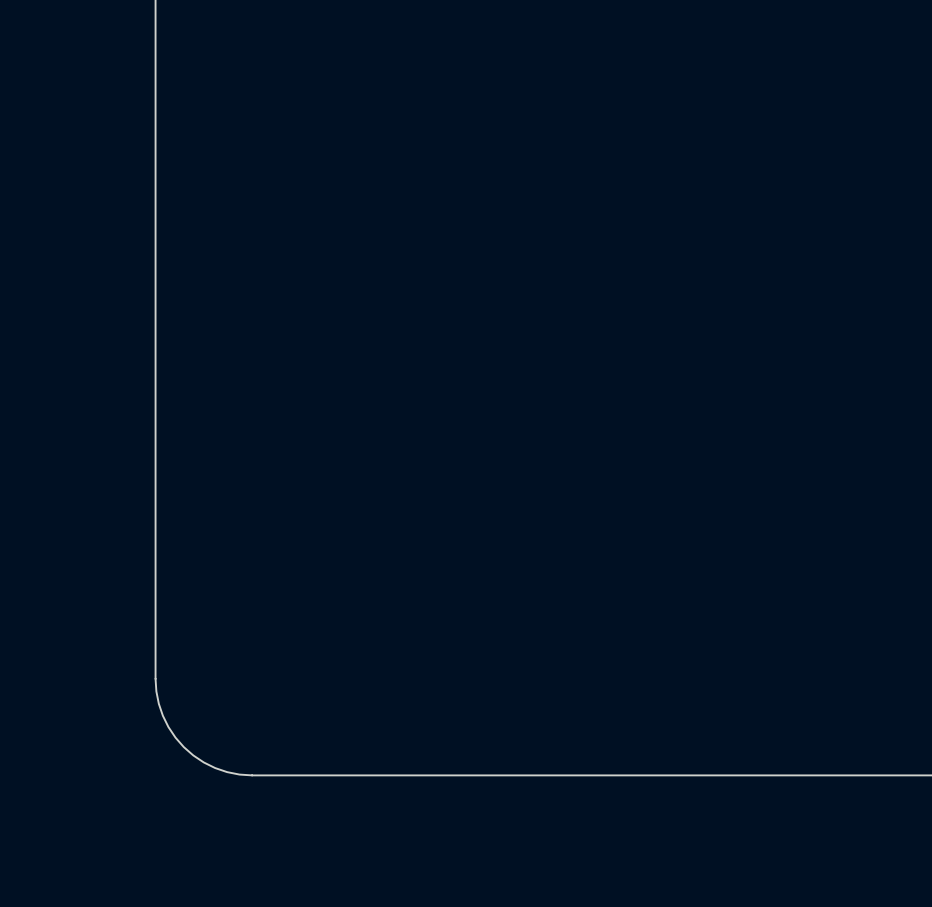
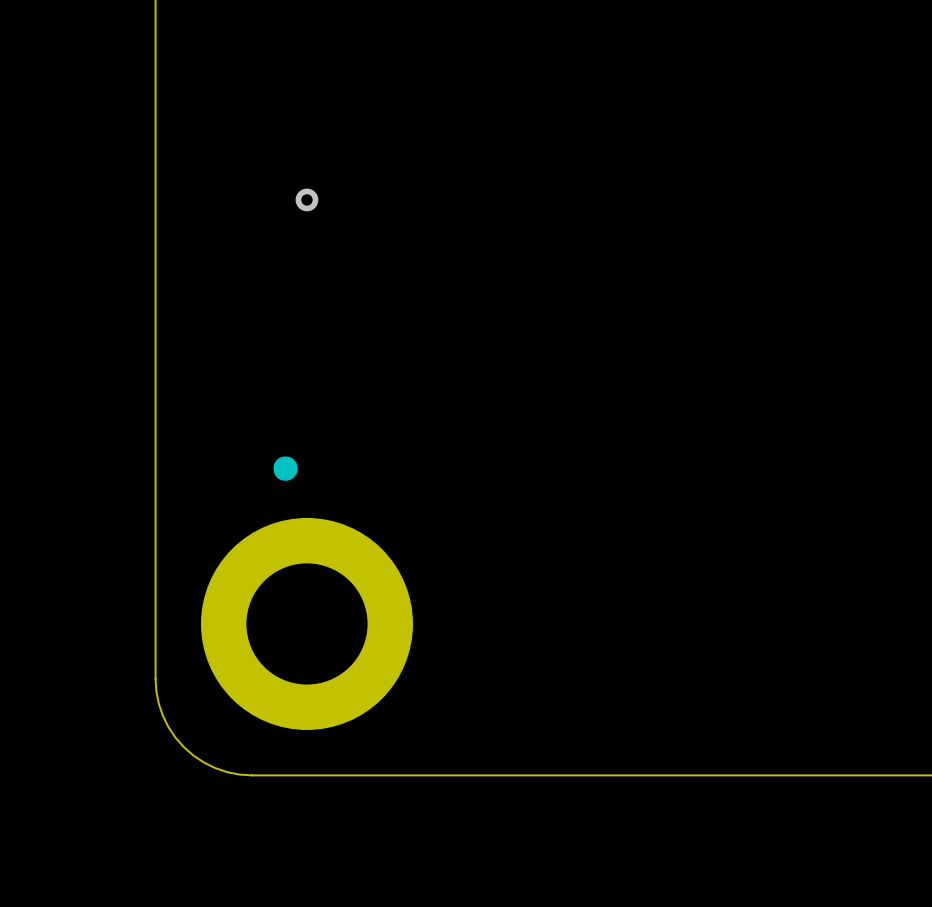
via: none -> (306, 199)
drawing: none -> [273, 456, 298, 481]
part: none -> (306, 623)

